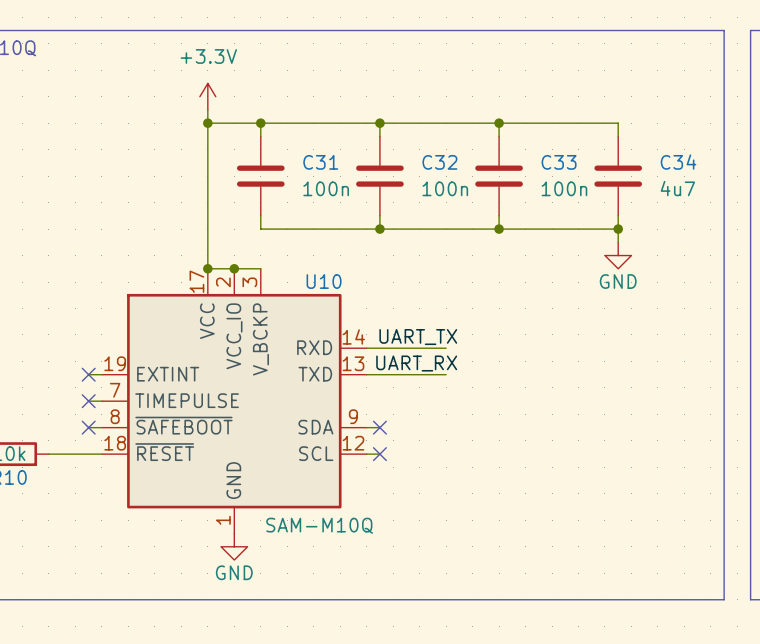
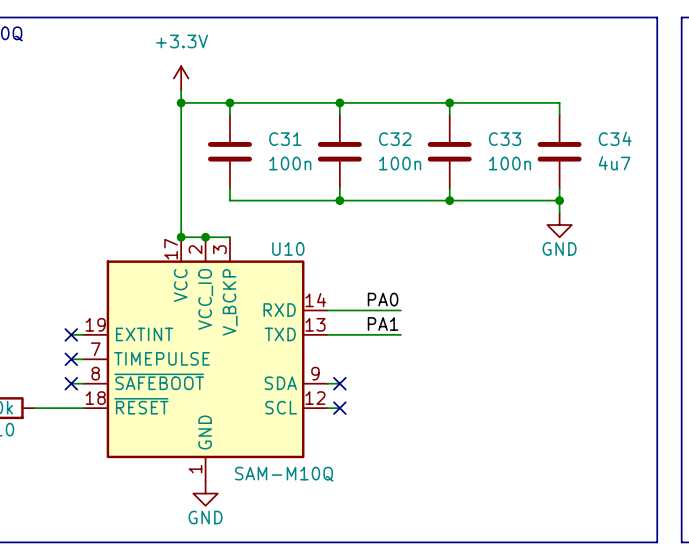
label: none -> PA0 (383, 299)
label: UART_TX (418, 337) -> none
label: none -> PA1 (383, 323)
label: UART_RX (416, 363) -> none

